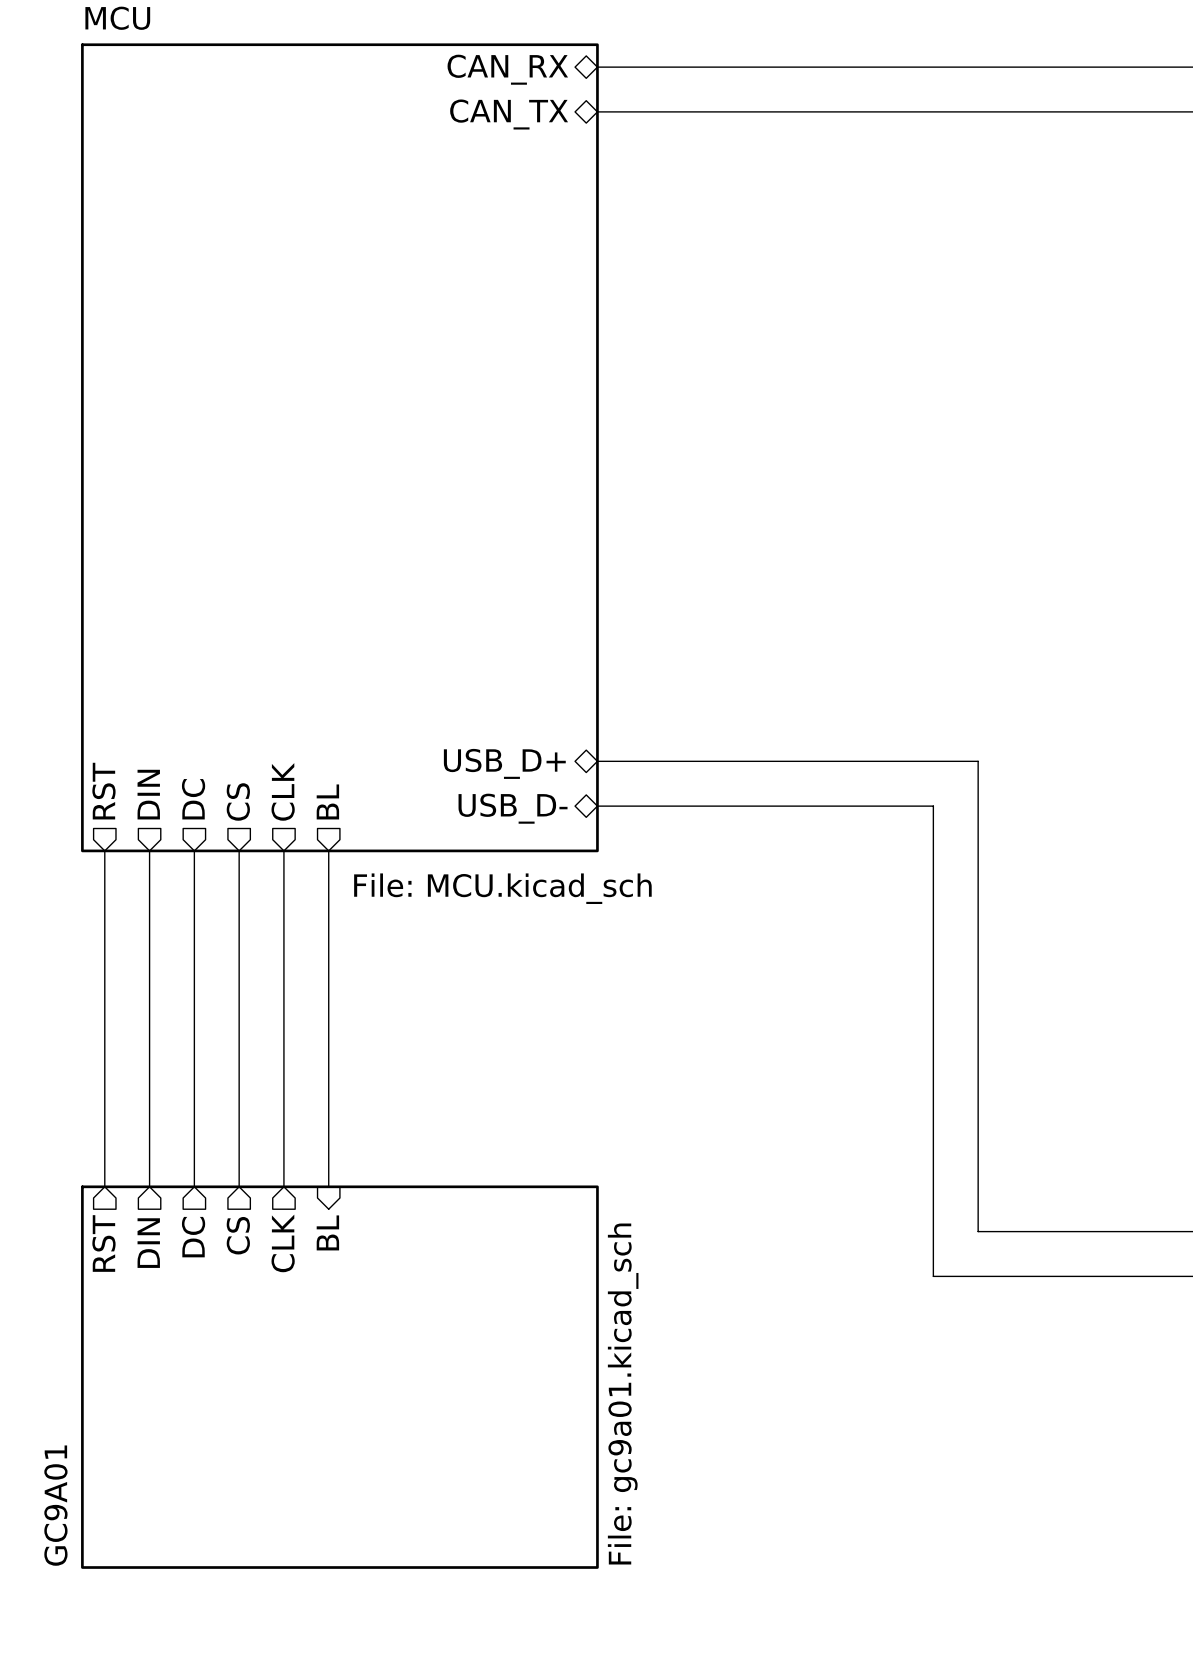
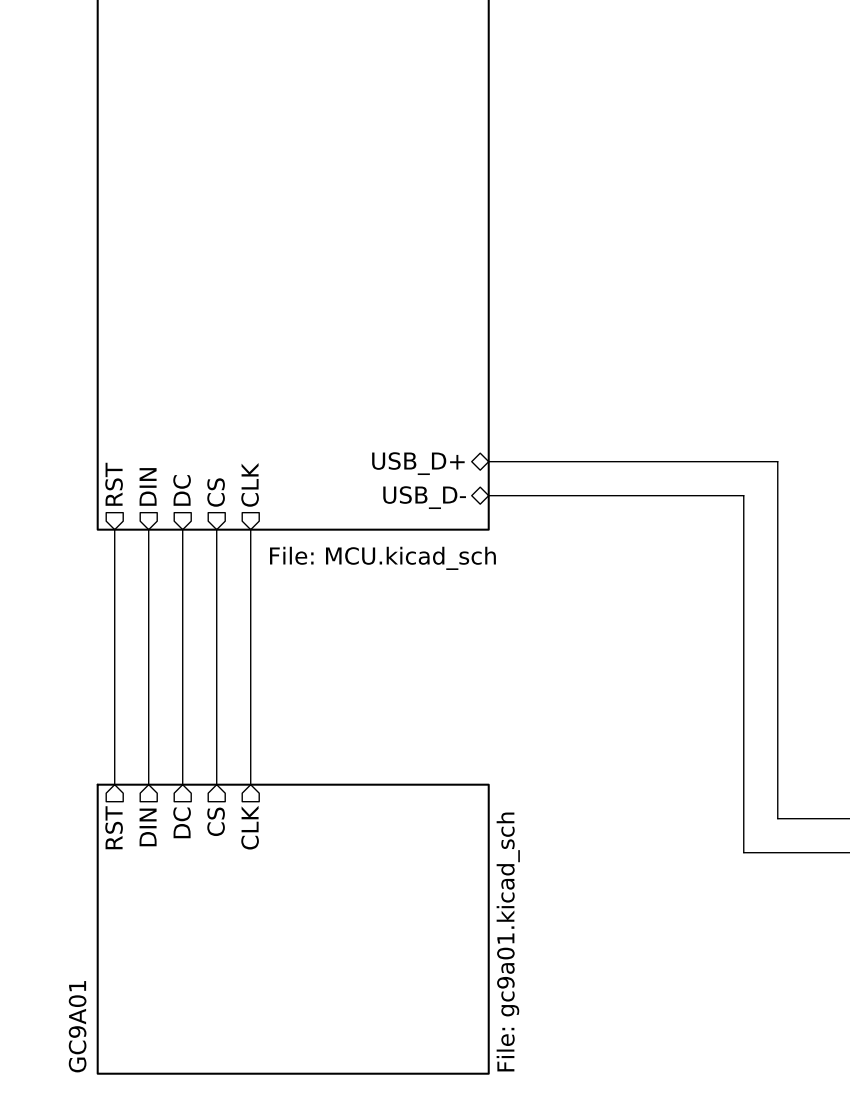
sheet pin: BL (327, 801) -> none
wire: (328, 850) (328, 1186) -> none
sheet MCU value position: File: MCU.kicad_sch (502, 888) -> File: MCU.kicad_sch (382, 558)
sheet pin: BL (327, 1232) -> none

